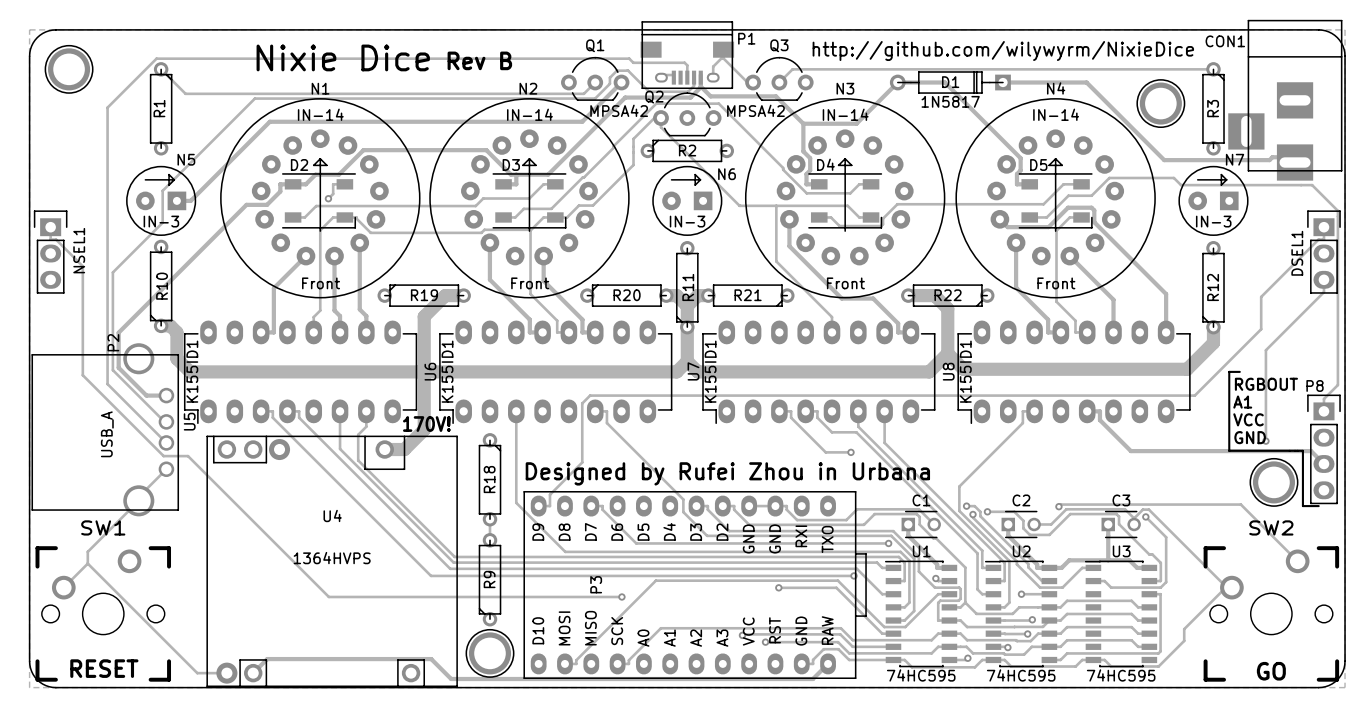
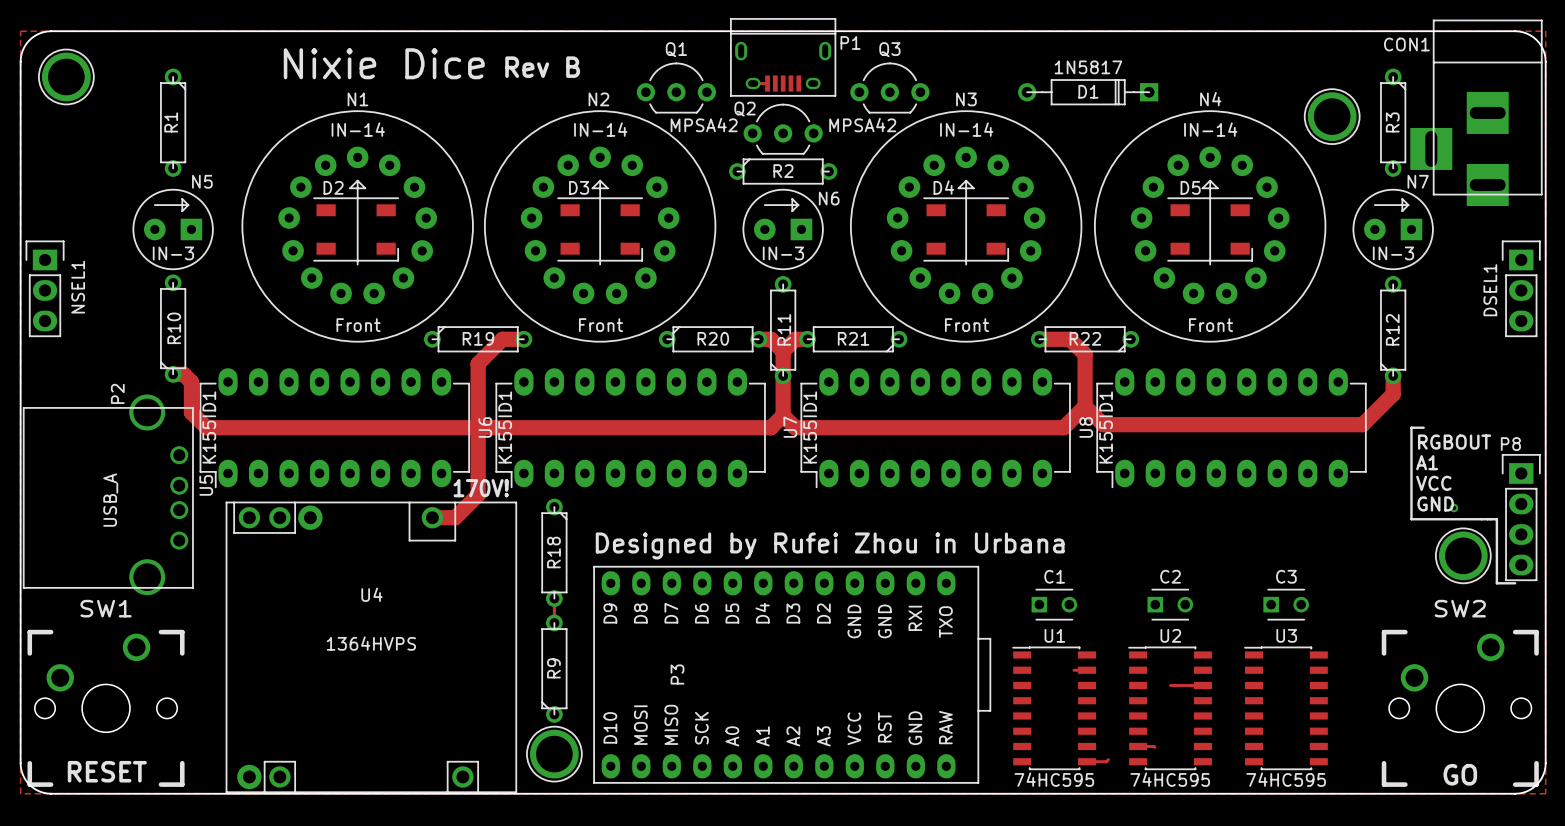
P1 footprint: [640, 21, 735, 90] -> [730, 18, 837, 97]
text: http://github.com/wilywyrm/NixieDice (1003, 51) -> none
track: (723, 58) (713, 66) (713, 75) -> none
track: (723, 58) (747, 82) (753, 82) -> none
track: (161, 69) (185, 93) (583, 93) (595, 82) -> none
track: (1213, 69) (792, 69) (779, 82) -> none
track: (687, 75) (687, 65) (684, 62) (633, 62) (629, 58) (156, 58) (107, 107) (107, 384) (166, 442) -> none
track: (700, 75) (700, 87) (690, 97) (625, 97) (548, 174) (510, 174) (486, 150) (363, 150) (338, 174) (315, 174) (305, 184) (280, 184) (280, 191) (267, 204) (246, 204) (118, 332) (118, 367) (146, 395) (166, 395) -> none
track: (694, 77) (694, 85) (688, 91) (649, 91) (628, 70) (616, 70) (609, 77) (609, 83) (595, 98) (254, 98) (162, 190) (162, 222) (112, 272) (112, 370) (166, 421) -> none
track: (621, 82) (582, 121) (269, 121) (190, 200) (176, 200) -> none
track: (1003, 82) (1086, 82) (1164, 160) (1269, 160) (1272, 157) (1295, 157) -> none
track: (700, 86) (710, 96) (776, 96) (803, 123) -> none
D1 value position: 1N5817 (950, 101) -> 1N5817 (1088, 67)
track: (803, 123) (856, 123) (897, 82) (944, 82) (1020, 158) (1020, 170) (1016, 174) (1016, 184) (1029, 184) -> none
track: (803, 123) (803, 151) (810, 158) (810, 170) (806, 174) (806, 184) (819, 184) -> none
track: (516, 174) (516, 184) (503, 184) -> none
track: (344, 184) (333, 184) (333, 193) (328, 198) -> none
track: (555, 184) (543, 184) (529, 198) (483, 198) (475, 206) (316, 206) (304, 217) (293, 217) -> none
track: (871, 184) (859, 184) (850, 193) (806, 193) (718, 103) (656, 103) (551, 208) (523, 208) (515, 217) (503, 217) -> none
track: (1081, 184) (1063, 184) (1043, 204) (897, 204) (883, 218) (881, 226) (839, 226) (830, 217) (819, 217) -> none
via: (328, 198) -> none
track: (776, 205) (776, 261) (832, 317) (832, 332) -> none
track: (871, 217) (859, 217) (847, 205) (739, 205) (661, 127) (661, 118) (654, 118) (633, 138) (633, 165) (592, 205) (578, 205) (567, 217) (543, 217) (530, 230) -> none
track: (1029, 217) (1046, 217) (1068, 195) (1091, 195) (1109, 178) (1173, 178) (1181, 185) (1312, 185) (1337, 210) (1337, 385) (1323, 399) (1323, 411) -> none
track: (1081, 217) (1069, 217) (1056, 230) (1056, 301) (1075, 320) (1075, 332) (1087, 332) -> none
track: (789, 219) (789, 246) (841, 298) (873, 298) (898, 323) (898, 332) (910, 332) -> none
track: (999, 219) (1007, 227) (1048, 227) (1068, 207) (1091, 207) (1094, 210) (1094, 222) (1166, 294) (1166, 332) -> none
track: (50, 227) (50, 239) (56, 239) (82, 266) (82, 375) (163, 456) (188, 456) (328, 596) (621, 596) -> none
track: (1323, 227) (1323, 239) (1318, 239) (1261, 296) (1261, 329) (1194, 395) (590, 395) (582, 403) (582, 462) (549, 494) (549, 506) (538, 506) -> none
track: (530, 230) (530, 294) (557, 320) (557, 332) (568, 332) -> none
track: (530, 230) (484, 229) (481, 232) (370, 232) (356, 217) (333, 217) (320, 230) (320, 310) (313, 317) (313, 332) -> none
track: (359, 242) (359, 309) (366, 316) (366, 332) -> none
track: (489, 242) (489, 279) (529, 319) (529, 332) (542, 332) -> none
track: (1016, 242) (1016, 287) (1048, 319) (1048, 332) (1060, 332) -> none
track: (306, 256) (273, 288) (273, 332) (261, 332) -> none
track: (334, 256) (334, 310) (340, 316) (340, 332) -> none
track: (543, 256) (543, 280) (582, 319) (582, 332) (595, 332) -> none
track: (1069, 256) (1113, 299) (1113, 332) -> none
track: (1323, 279) (1323, 292) (1265, 350) (1265, 441) -> none
track: (261, 411) (272, 411) (272, 417) (431, 575) (853, 575) -> none
track: (287, 411) (299, 411) (299, 417) (450, 568) (856, 568) (882, 594) (893, 594) -> none
track: (340, 411) (340, 448) (453, 562) (877, 562) (882, 567) (893, 567) -> none
track: (366, 411) (366, 426) (358, 434) (358, 460) (454, 556) (898, 556) (904, 562) (904, 581) (893, 581) -> none
track: (516, 411) (516, 502) (565, 551) (900, 551) (909, 560) (909, 602) (904, 607) (893, 607) -> none
track: (595, 411) (606, 411) (606, 423) (683, 499) (683, 512) (707, 535) (891, 535) (914, 558) (914, 611) (904, 620) (893, 620) -> none
track: (779, 411) (791, 411) (791, 417) (825, 452) (851, 452) -> none
track: (805, 411) (817, 411) (817, 417) (832, 432) (856, 432) (977, 553) (977, 589) (982, 594) (993, 594) -> none
track: (858, 411) (858, 426) (982, 550) (982, 567) (993, 567) -> none
track: (884, 411) (884, 442) (1004, 562) (1004, 581) (993, 581) -> none
track: (1034, 411) (1022, 411) (1022, 423) (959, 486) (959, 510) (1009, 560) (1009, 602) (1004, 607) (993, 607) -> none
track: (1087, 411) (1099, 411) (1099, 420) (1130, 451) (1311, 451) (1323, 463) -> none
via: (851, 452) -> none
track: (166, 469) (138, 496) (138, 500) (87, 551) (87, 563) -> none
track: (591, 506) (602, 506) (602, 509) (636, 543) (888, 543) -> none
track: (696, 506) (707, 506) (707, 509) (729, 531) (893, 531) (918, 556) (918, 571) (934, 587) (960, 589) (960, 598) (958, 600) (940, 600) (938, 602) (938, 620) (960, 620) (967, 627) (1014, 627) -> none
track: (722, 506) (734, 506) (734, 509) (749, 524) (863, 524) (874, 514) (916, 514) (919, 516) (919, 524) (965, 567) (965, 602) -> none
track: (749, 506) (786, 506) (786, 509) (797, 520) (846, 520) (857, 509) (919, 509) (934, 524) -> none
track: (966, 506) (974, 506) (980, 511) (980, 516) (1028, 564) (1028, 567) (1042, 581) (1049, 581) -> none
via: (966, 506) -> none
track: (1058, 506) (1061, 504) (1240, 504) (1297, 561) -> none
via: (1058, 506) -> none
track: (987, 511) (1014, 511) (1023, 520) (1023, 528) (1029, 534) (1049, 534) (1070, 514) (1116, 514) (1119, 516) (1119, 524) (1149, 554) (1152, 554) (1160, 562) (1160, 580) (1149, 581) -> none
via: (987, 511) -> none
track: (972, 514) (972, 517) (1040, 587) (1062, 587) (1082, 567) (1093, 567) -> none
via: (972, 514) -> none
track: (1145, 516) (1166, 537) (1166, 582) (1160, 587) (1111, 587) (1104, 581) (1093, 581) -> none
via: (1145, 516) -> none
track: (1134, 518) (1142, 509) (1148, 509) (1225, 587) -> none
track: (1134, 518) (1125, 509) (1066, 509) (1051, 524) (1034, 524) -> none
track: (908, 524) (908, 535) (937, 564) (937, 567) (949, 567) -> none
track: (1008, 524) (1008, 535) (1037, 564) (1037, 567) (1061, 567) (1069, 560) (1129, 560) (1137, 567) (1149, 567) -> none
track: (1108, 524) (1108, 560) -> none
via: (888, 543) -> none
track: (87, 563) (63, 587) -> none
track: (87, 563) (197, 673) (226, 673) -> none
via: (853, 575) -> none
via: (935, 578) -> none
track: (778, 587) (836, 587) (882, 633) (893, 633) -> none
via: (778, 587) -> none
track: (1225, 587) (1184, 629) (1184, 640) (1158, 666) (1111, 666) (1104, 659) (1082, 659) (1075, 666) (1011, 666) (1004, 659) (982, 659) (974, 667) (912, 667) (904, 659) (849, 659) (838, 649) (823, 649) (813, 659) (813, 663) (801, 663) -> none
track: (949, 594) (938, 594) (905, 627) (884, 627) (837, 580) (655, 580) (576, 660) (576, 663) (564, 663) -> none
via: (1021, 594) -> none
track: (1149, 594) (1160, 594) (1160, 651) (1158, 653) (1067, 653) (1060, 659) (1049, 659) -> none
via: (621, 596) -> none
track: (965, 602) (976, 613) (1012, 613) (1019, 607) (1060, 607) (1067, 600) (1131, 600) (1138, 607) (1149, 607) -> none
track: (965, 602) (960, 607) (949, 607) -> none
track: (1032, 619) (993, 620) -> none
via: (1032, 619) -> none
track: (1149, 620) (1138, 620) (1131, 613) (1067, 613) (1060, 620) (1049, 620) (1043, 626) (1014, 626) -> none
track: (993, 633) (1027, 634) -> none
track: (1149, 633) (1138, 633) (1131, 627) (1067, 627) (1060, 633) (1038, 633) (1030, 641) (967, 640) (960, 633) (938, 633) (931, 640) (852, 640) (840, 628) (660, 628) (628, 660) (628, 663) (617, 663) -> none
via: (1027, 634) -> none
track: (742, 635) (840, 634) (852, 646) (893, 646) -> none
via: (742, 635) -> none
track: (765, 642) (838, 642) (849, 653) (931, 653) (938, 646) (966, 646) (973, 653) (1024, 654) (1031, 646) (1060, 646) (1067, 640) (1131, 640) (1138, 646) (1149, 646) -> none
via: (765, 642) -> none
via: (1007, 647) -> none
via: (967, 658) -> none
track: (828, 663) (812, 679) (451, 679) (431, 659) (267, 659) (253, 673) -> none

